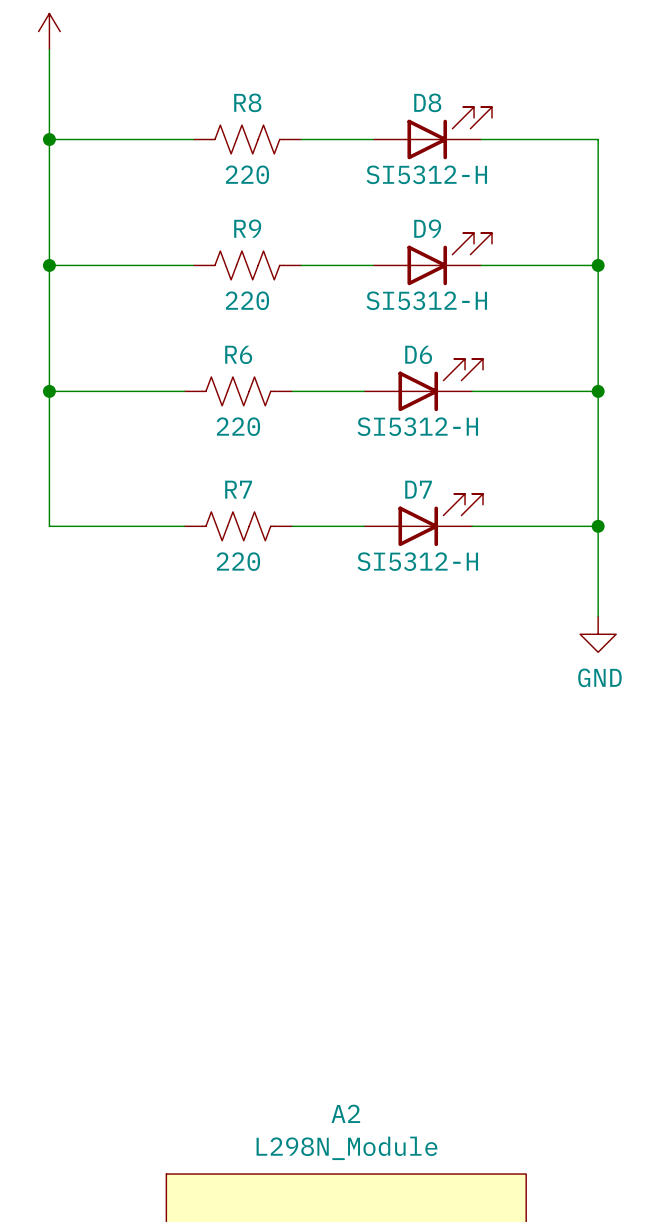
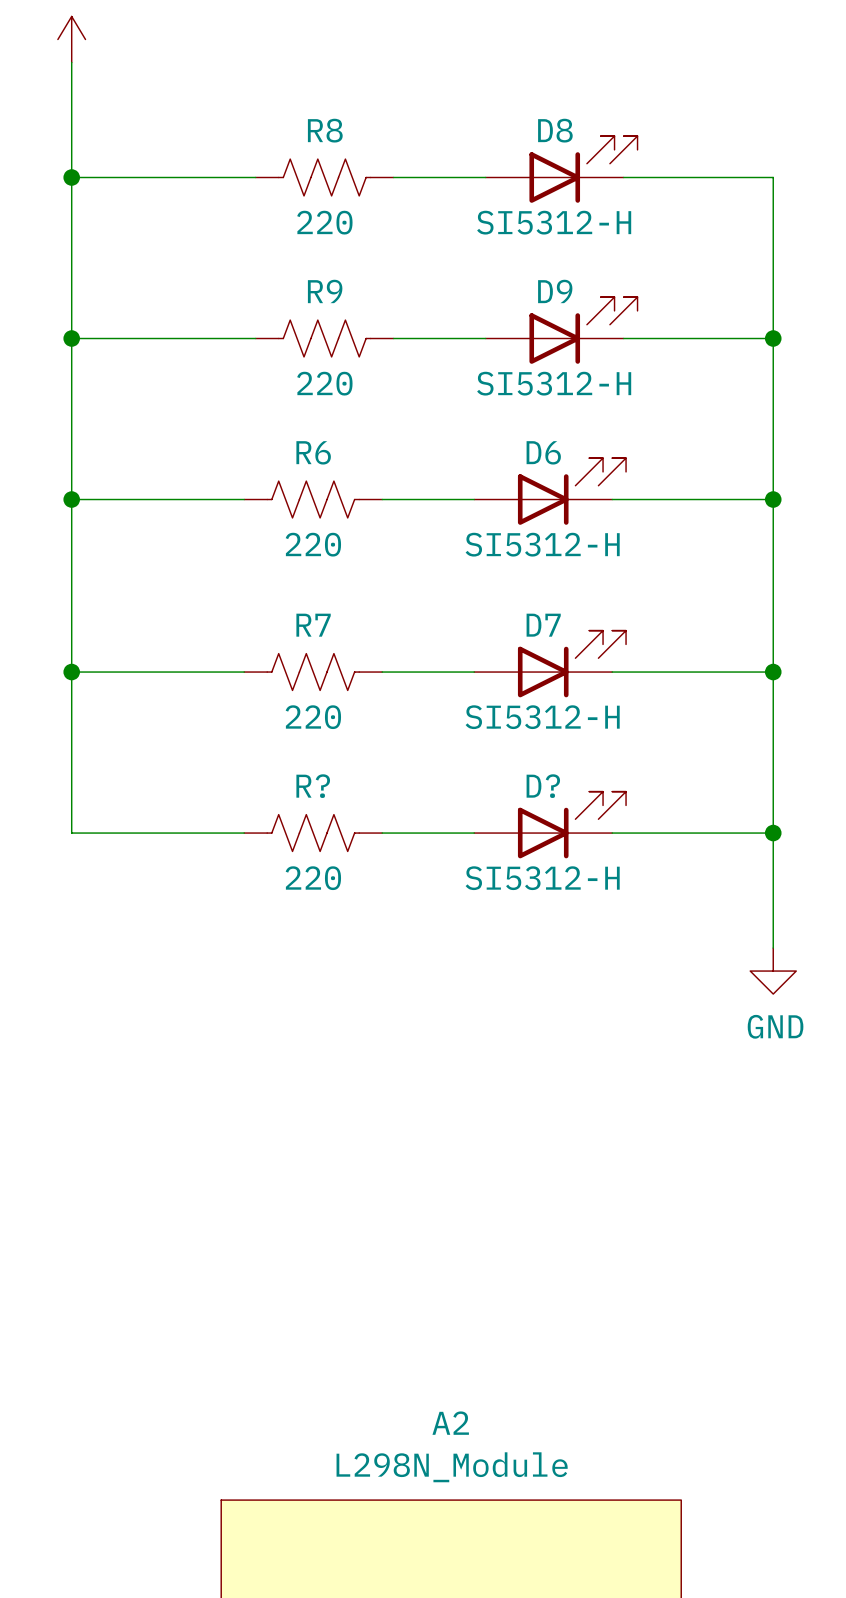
wire: none -> (71, 672) (71, 833) (244, 833)
junction: none -> (71, 672)
wire: none -> (773, 787) (773, 948)
power symbol position: GND (598, 634) -> GND (773, 971)
D?: none -> SI5312-H (550, 824)
R?: none -> 220 (313, 833)
wire: none -> (382, 833) (474, 833)
wire: none -> (612, 833) (773, 833)
junction: none -> (773, 833)

